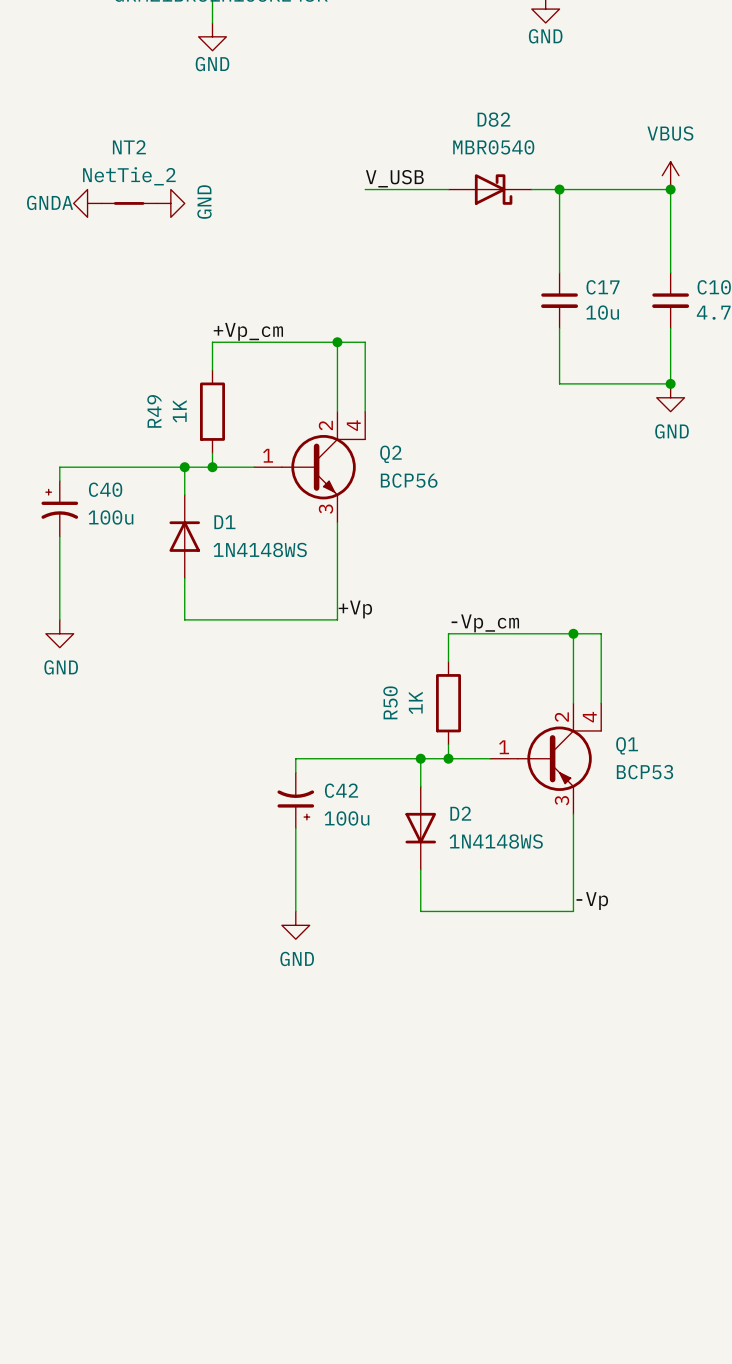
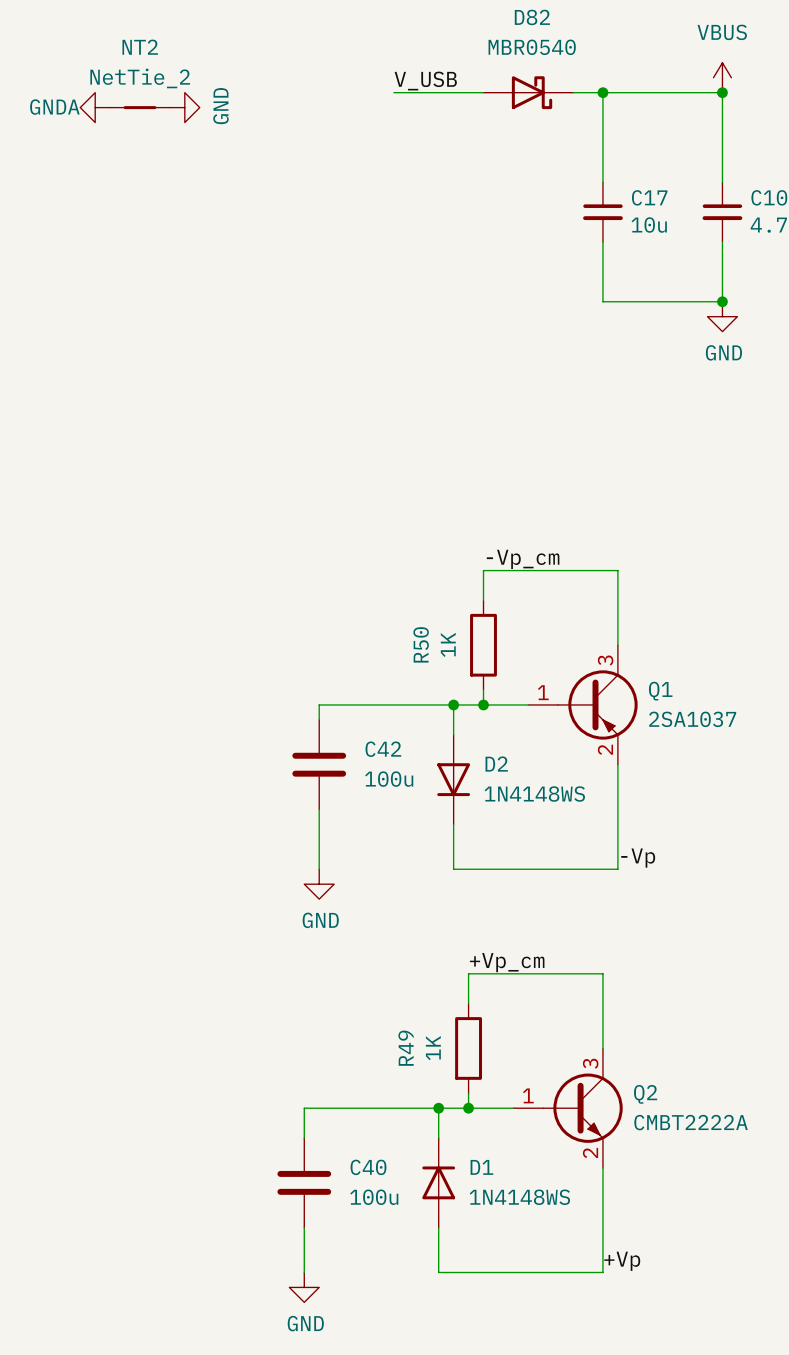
label: +Vp_cm (248, 331) -> none
wire: (337, 342) (337, 411) -> none
junction: (337, 342) -> none
wire: (212, 370) (212, 342) (365, 342) (365, 411) -> none
R49 position: (212, 411) -> (468, 1048)
Q2 symbol: [254, 411, 366, 523] -> [513, 1048, 623, 1168]
wire: (212, 453) (212, 467) -> none
wire: (184, 467) (184, 494) -> none
junction: (184, 467) -> none
junction: (212, 467) -> none
wire: (254, 467) (59, 467) (59, 481) -> none
Q2 value: BCP56 (409, 480) -> CMBT2222A (691, 1122)
C40 symbol: [41, 481, 79, 537] -> [277, 1138, 332, 1228]
wire: (337, 522) (337, 619) (184, 619) (184, 578) -> none
wire: (59, 536) (59, 619) -> none
D1 position: (184, 536) -> (438, 1182)
label: +Vp (355, 609) -> none
power symbol: GND (59, 633) -> none
wire: (573, 633) (601, 633) (601, 703) -> none
junction: (573, 633) -> none
Q1 symbol: [490, 703, 602, 815] -> [528, 645, 638, 765]
C42 symbol: [277, 772, 315, 829] -> [292, 719, 347, 810]
Q1 value: BCP53 (644, 772) -> 2SA1037 (692, 719)
label: none -> +Vp_cm (507, 962)
wire: none -> (468, 1003) (468, 973) (602, 973) (602, 1048)
wire: none -> (468, 1093) (468, 1108)
wire: none -> (438, 1108) (438, 1138)
junction: none -> (438, 1108)
junction: none -> (468, 1108)
wire: none -> (513, 1108) (304, 1108) (304, 1138)
wire: none -> (602, 1167) (602, 1272) (438, 1272) (438, 1227)
wire: none -> (304, 1227) (304, 1272)
label: none -> +Vp (622, 1261)
power symbol: none -> GND (304, 1287)

